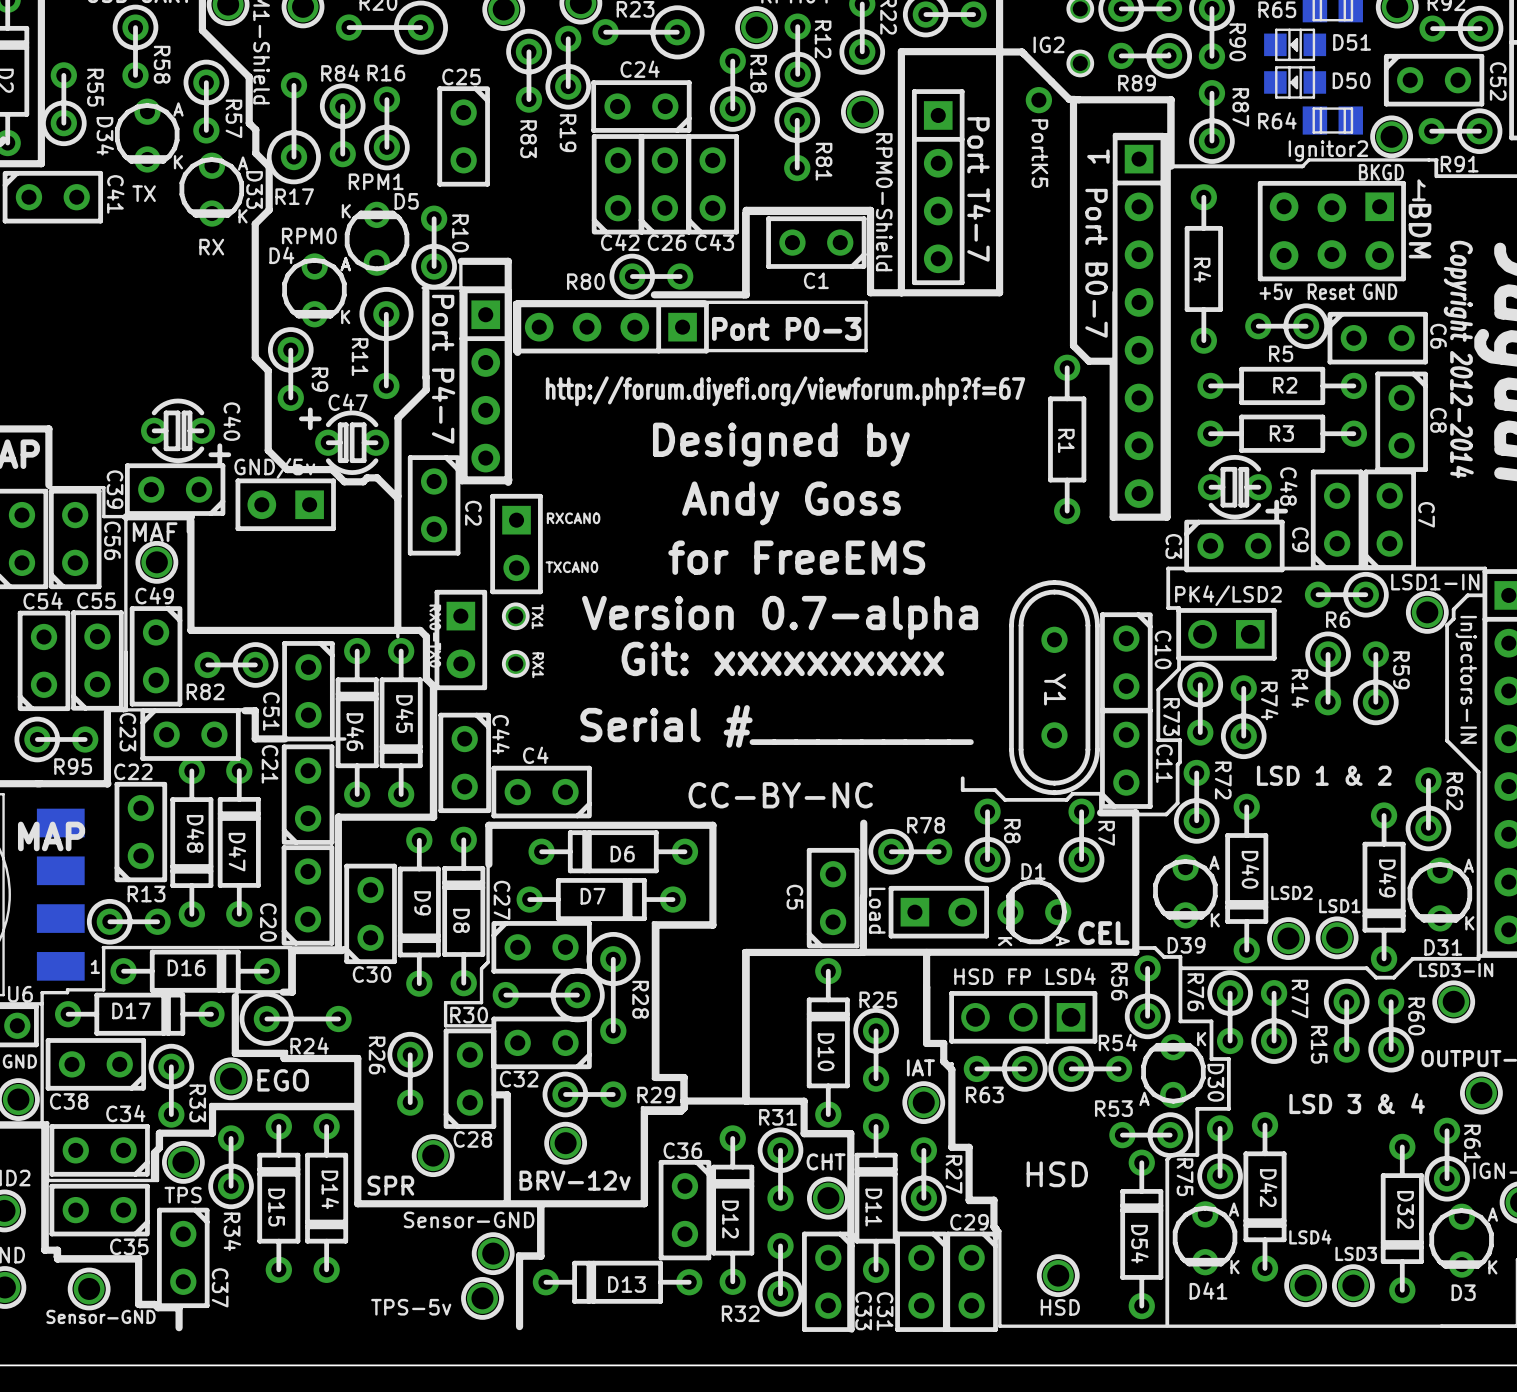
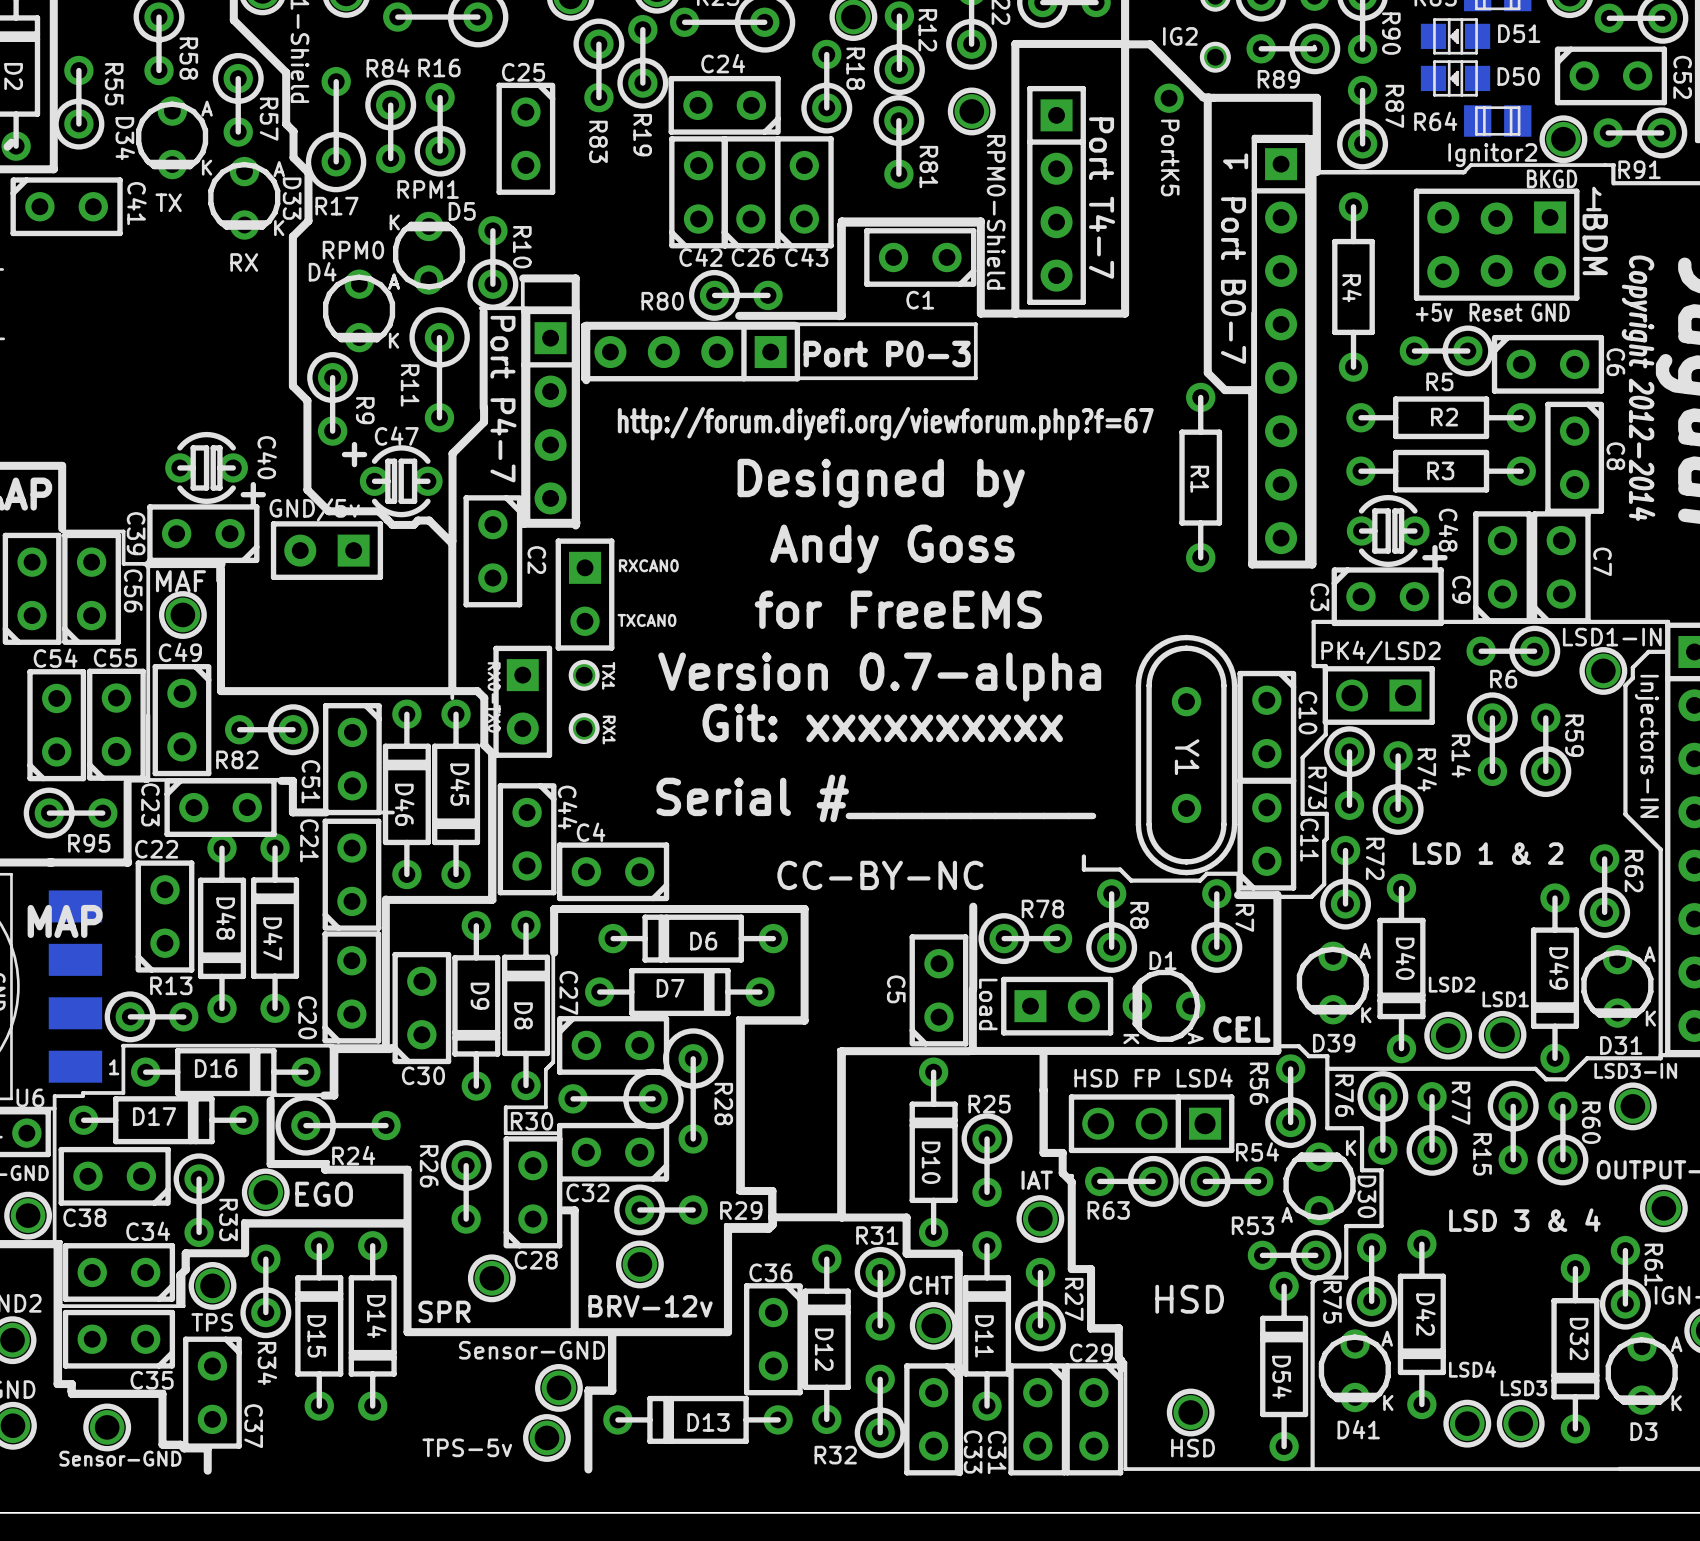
C4 name position: C4 (535, 755) -> C4 (591, 832)

